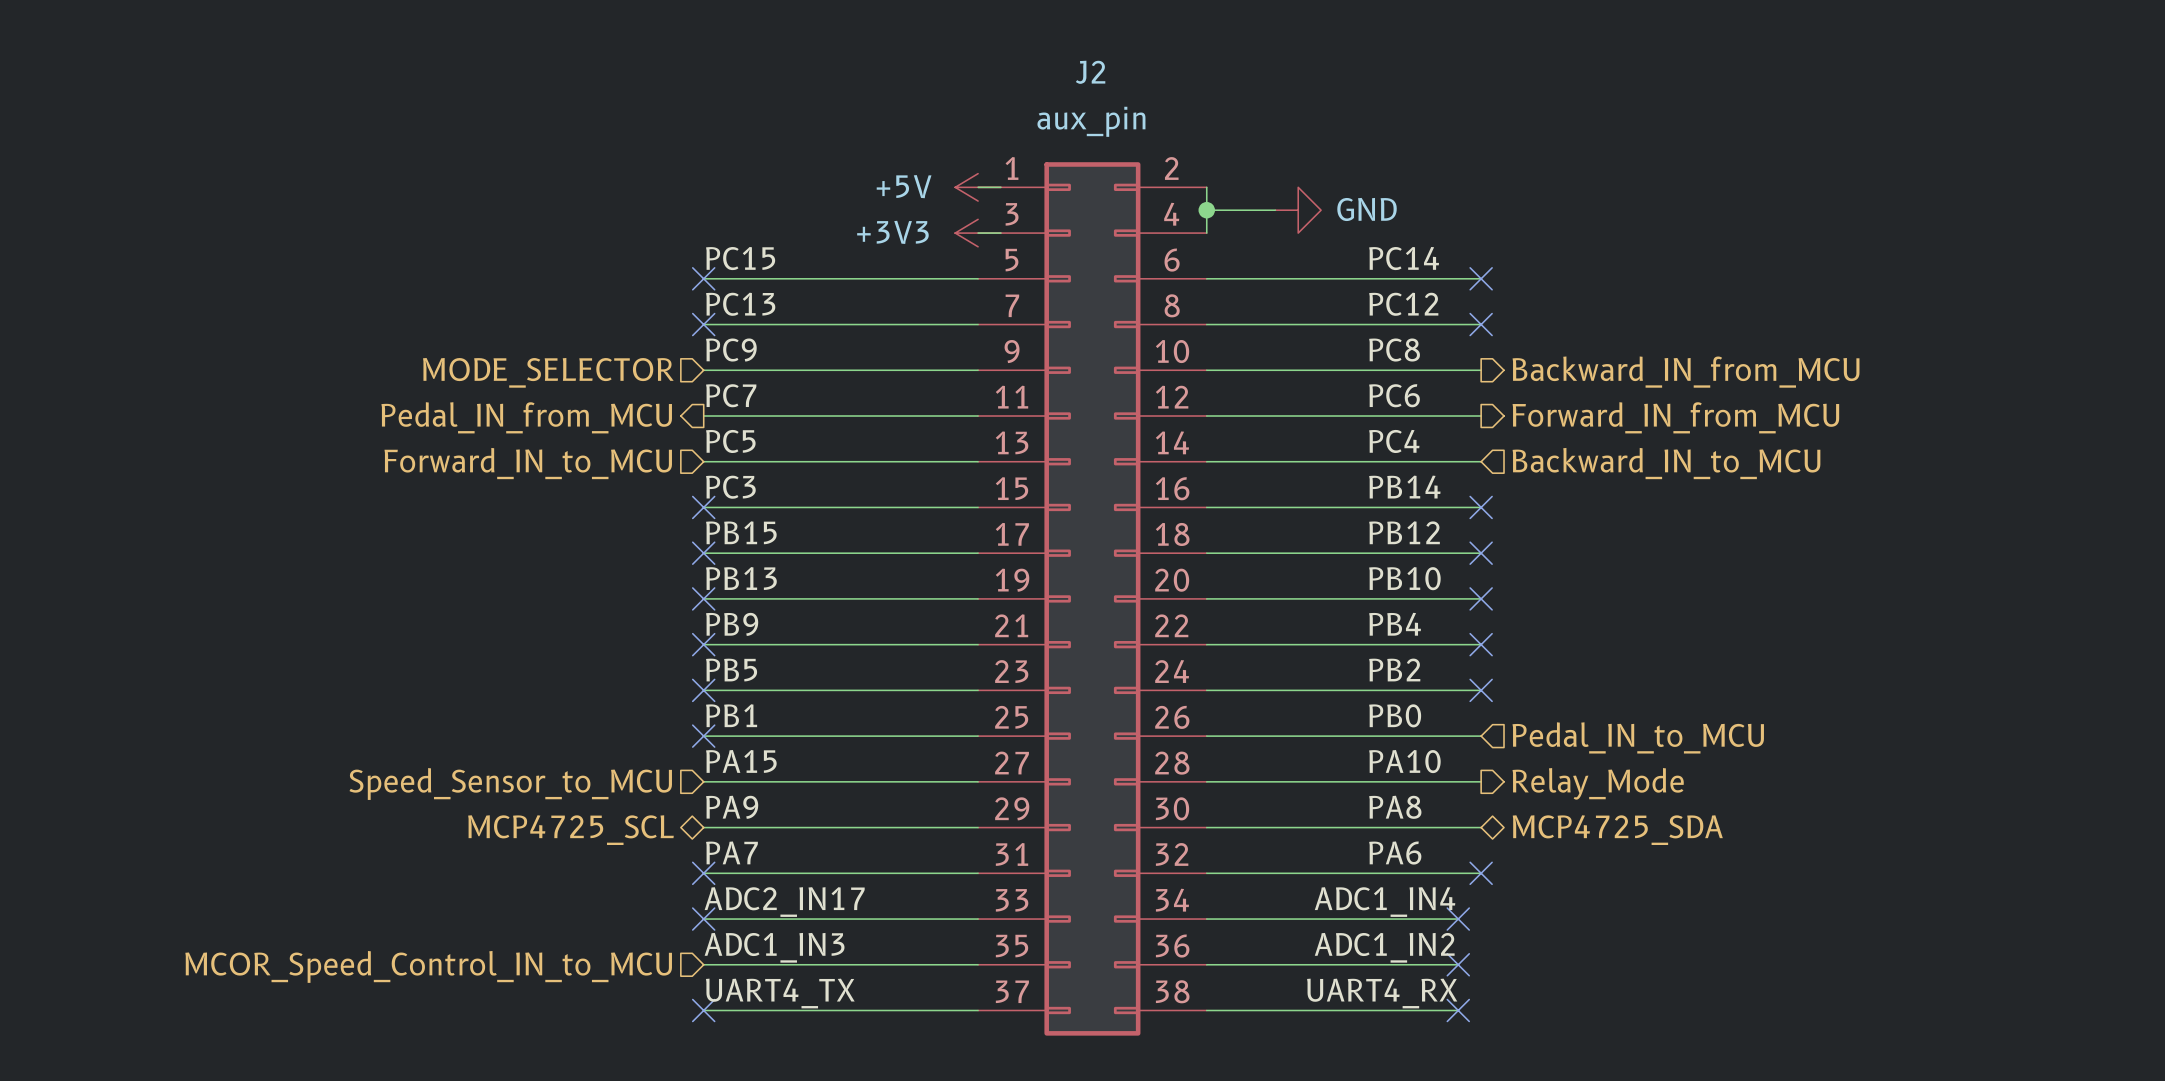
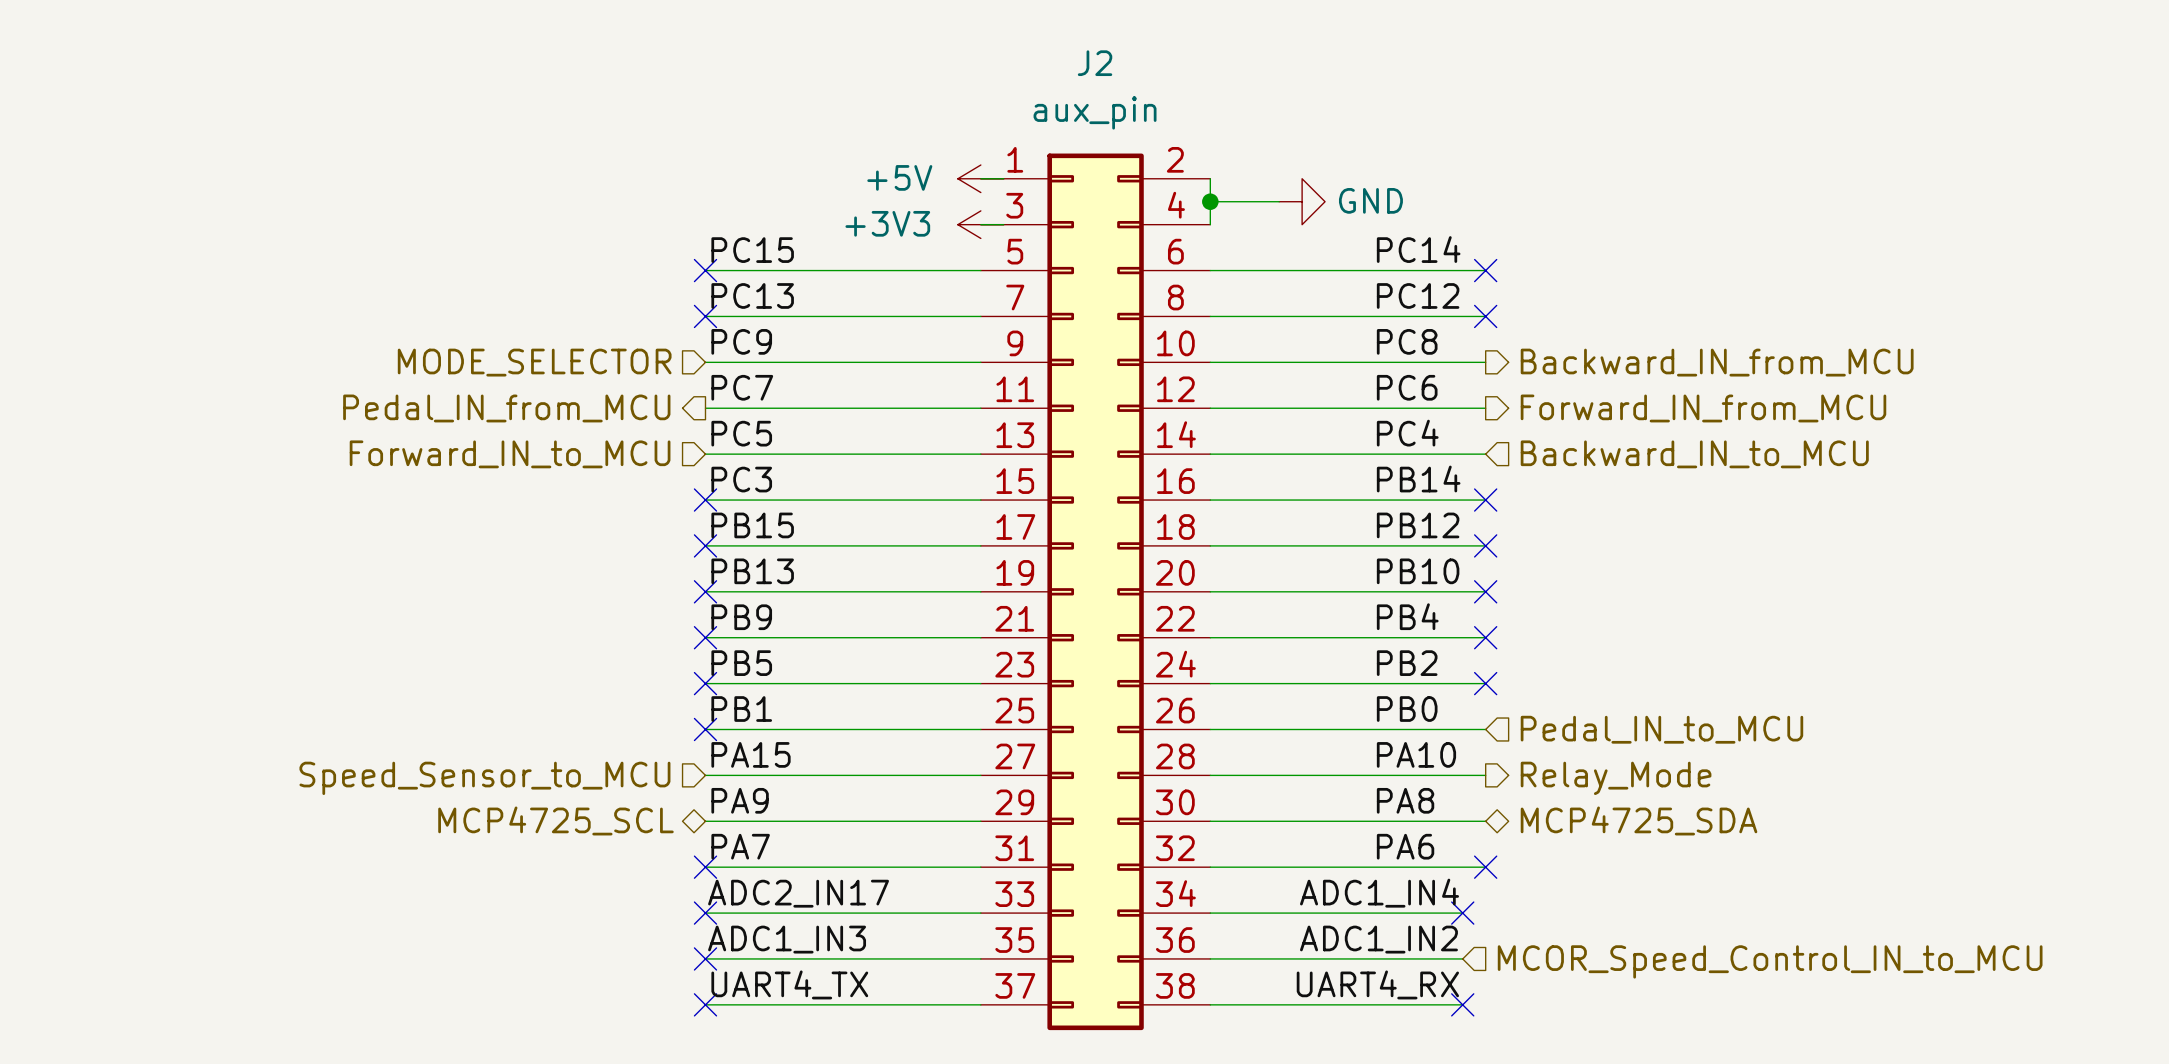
no-connect mark: none -> (705, 958)
no-connect mark: (1458, 964) -> none
hierarchical label: MCOR_Speed_Control_IN_to_MCU (428, 966) -> none
hierarchical label: none -> MCOR_Speed_Control_IN_to_MCU (1770, 961)

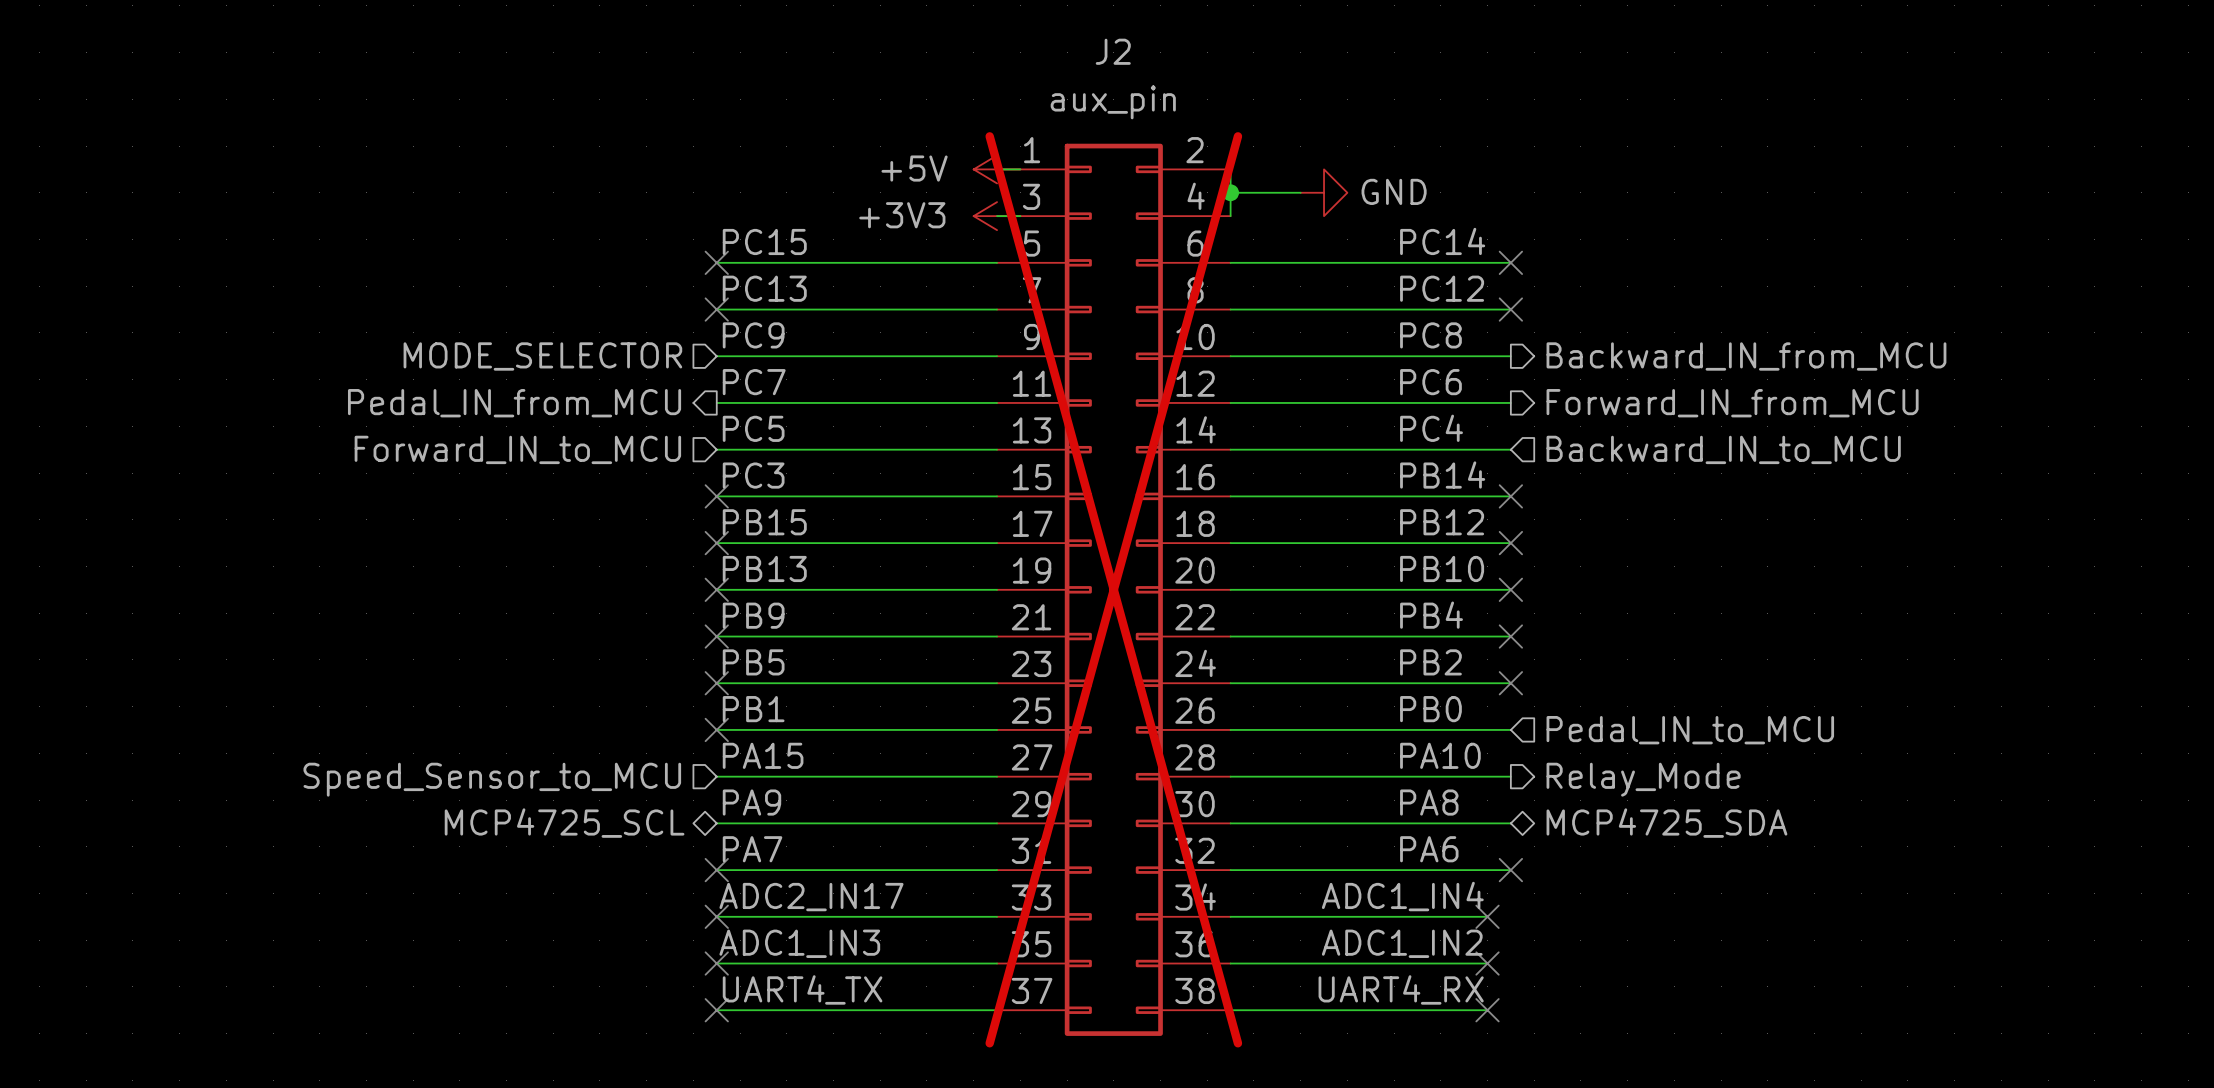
J2 do-not-place cross: none -> (1113, 589)
no-connect mark: none -> (1487, 963)
hierarchical label: MCOR_Speed_Control_IN_to_MCU (1770, 961) -> none

